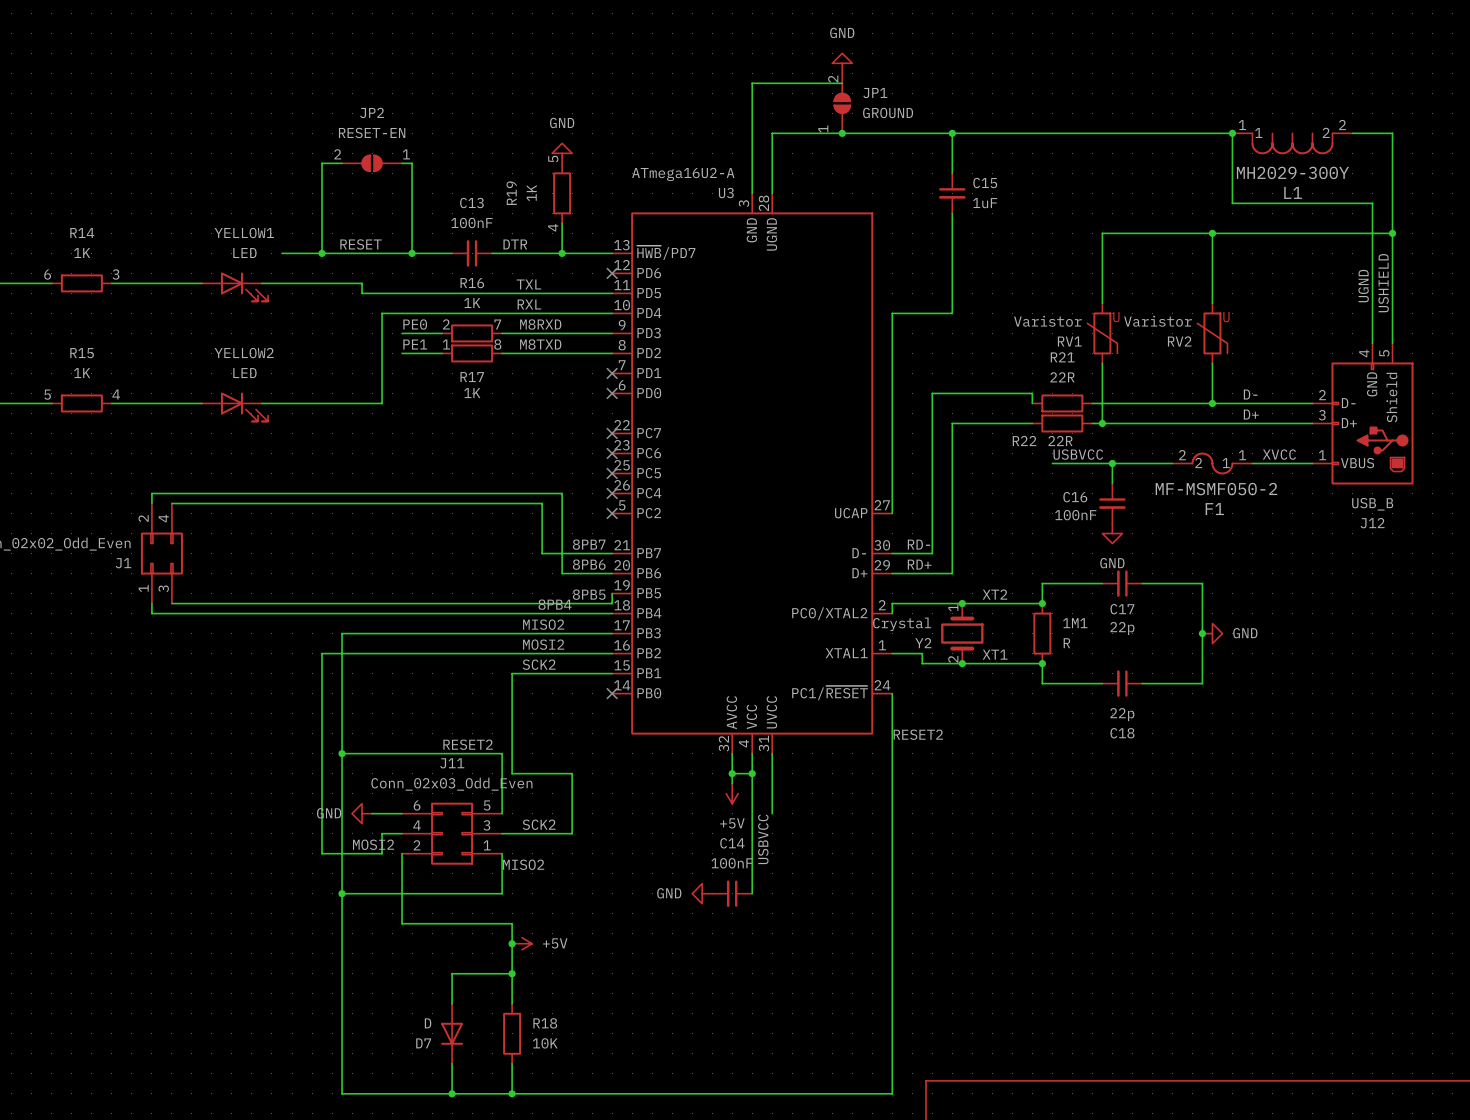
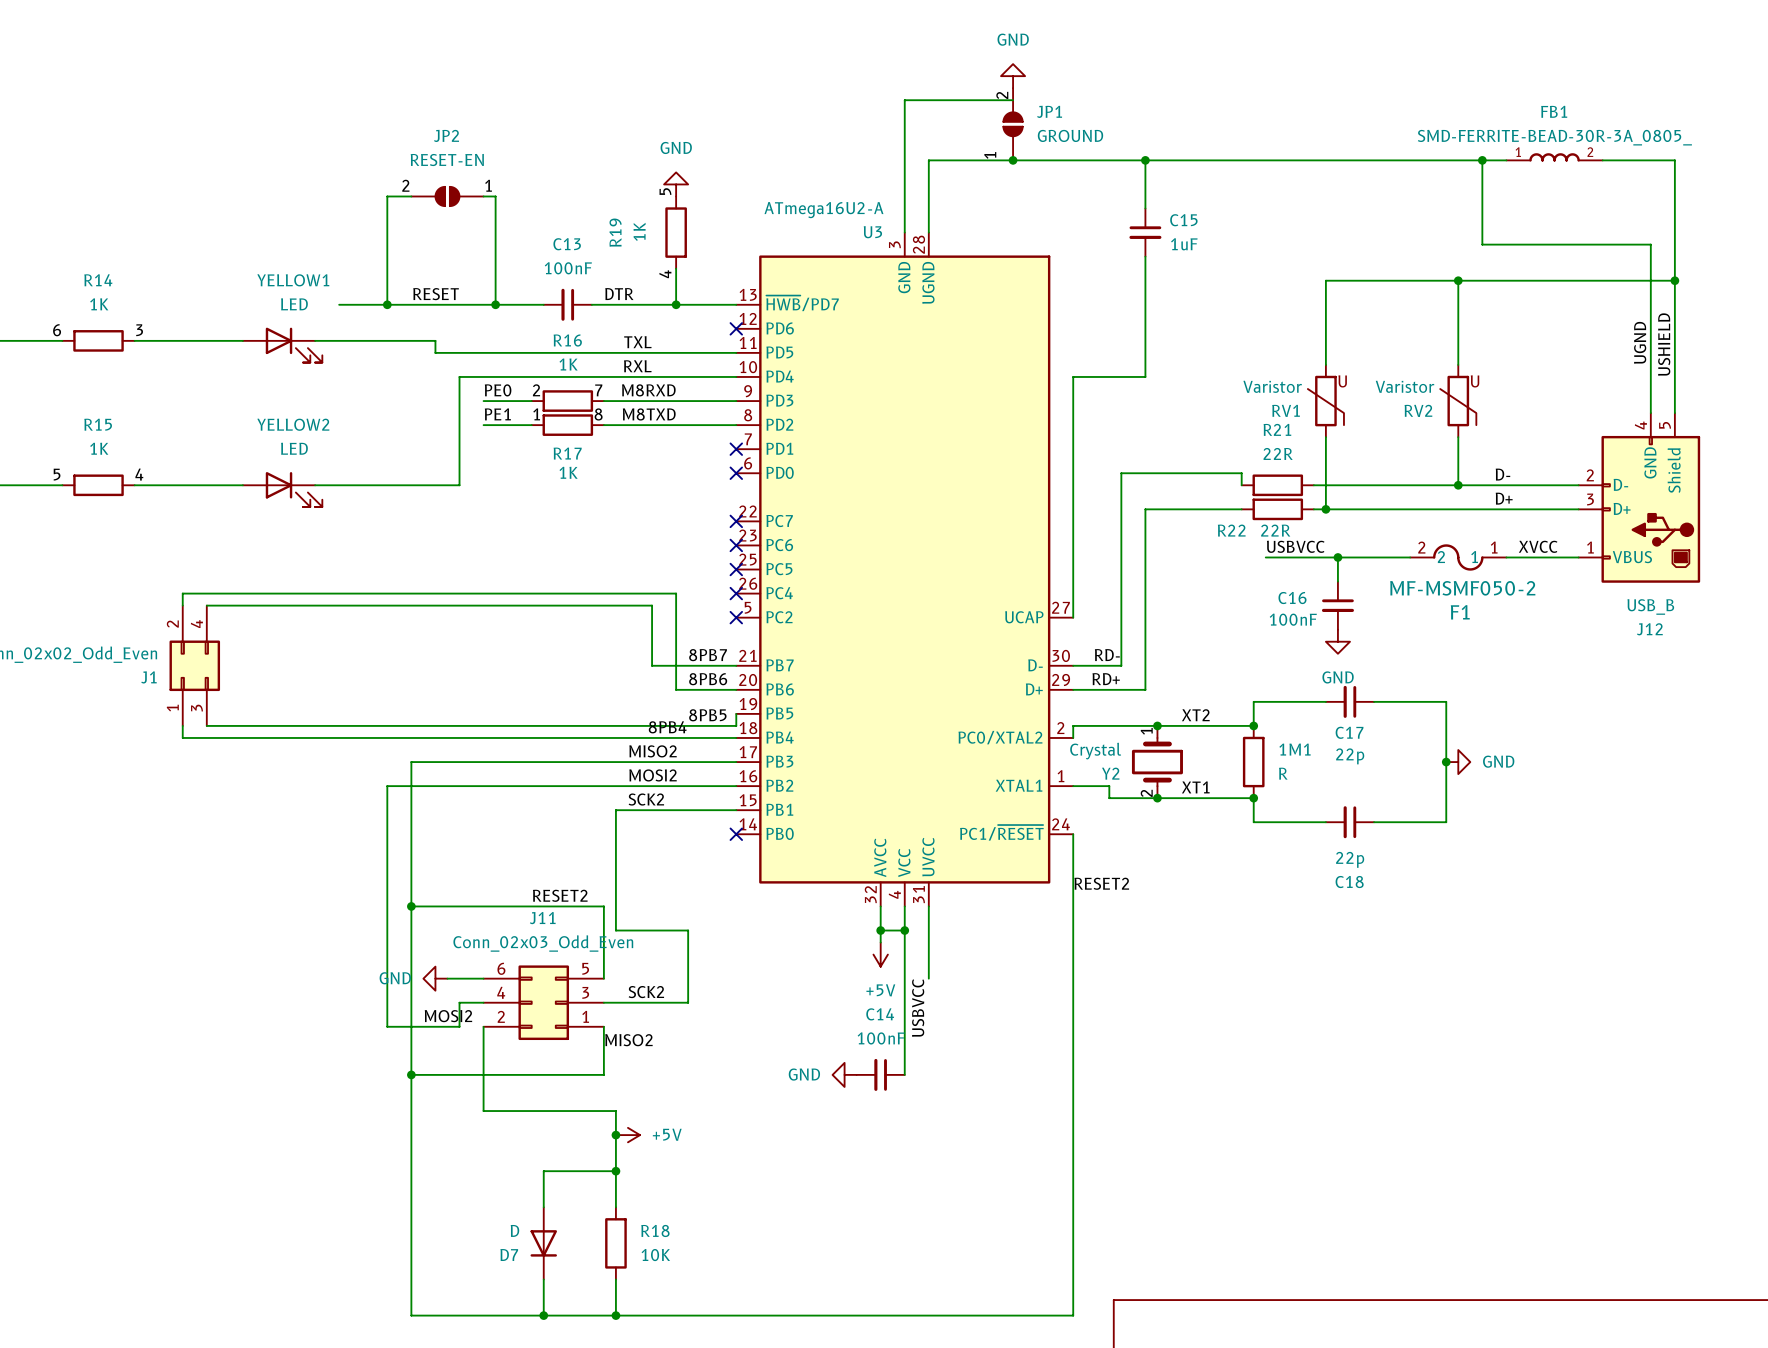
FB1: none -> SMD-FERRITE-BEAD-30R-3A_0805_ (1554, 157)
L1: MH2029-300Y (1292, 143) -> none

